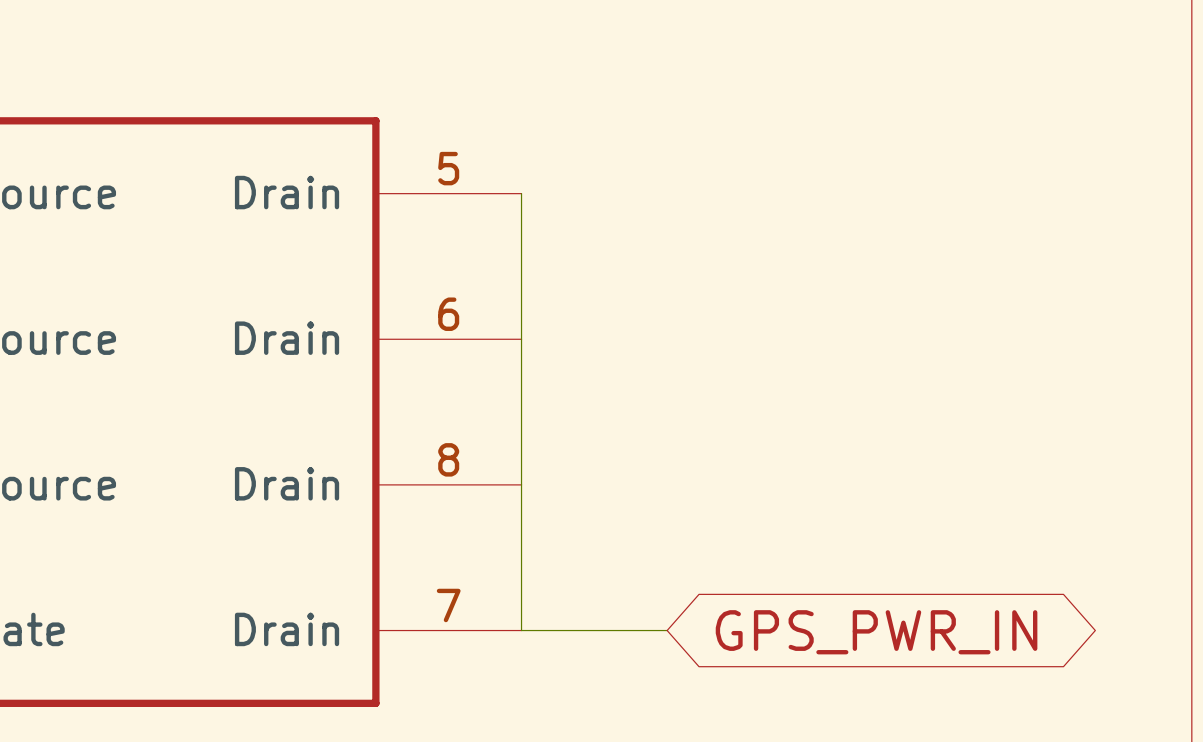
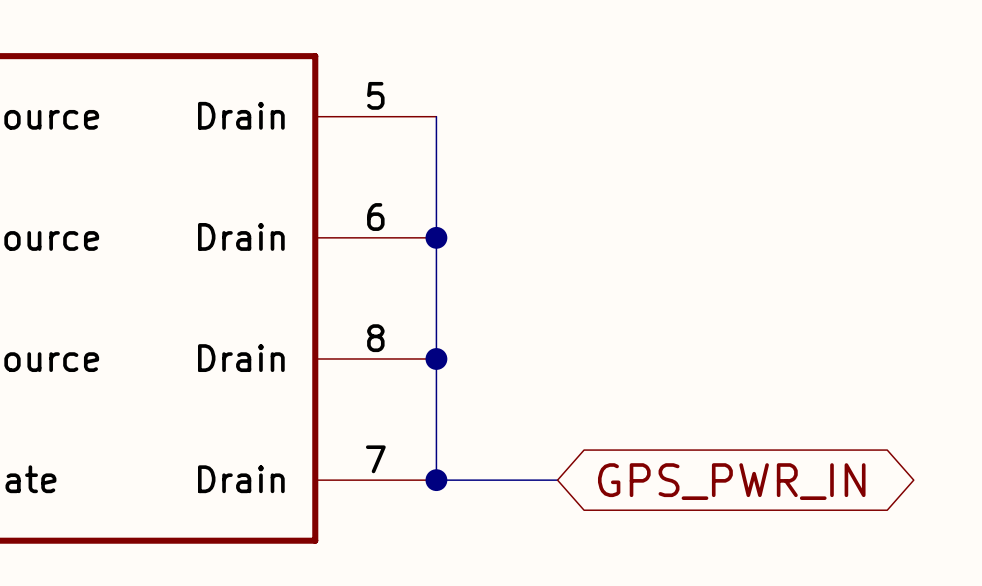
junction: none -> (436, 237)
junction: none -> (436, 358)
junction: none -> (436, 480)

